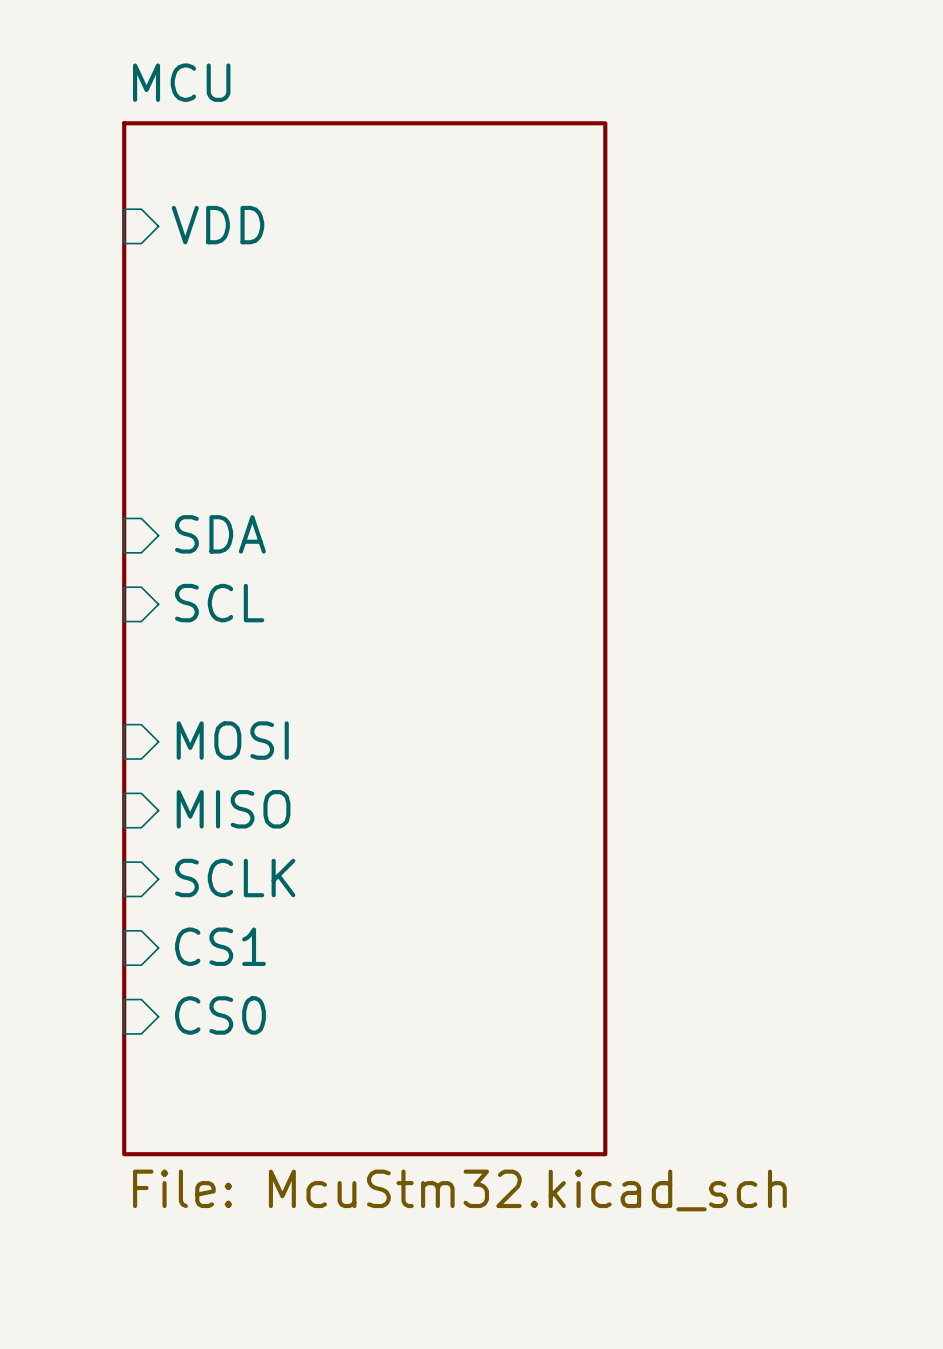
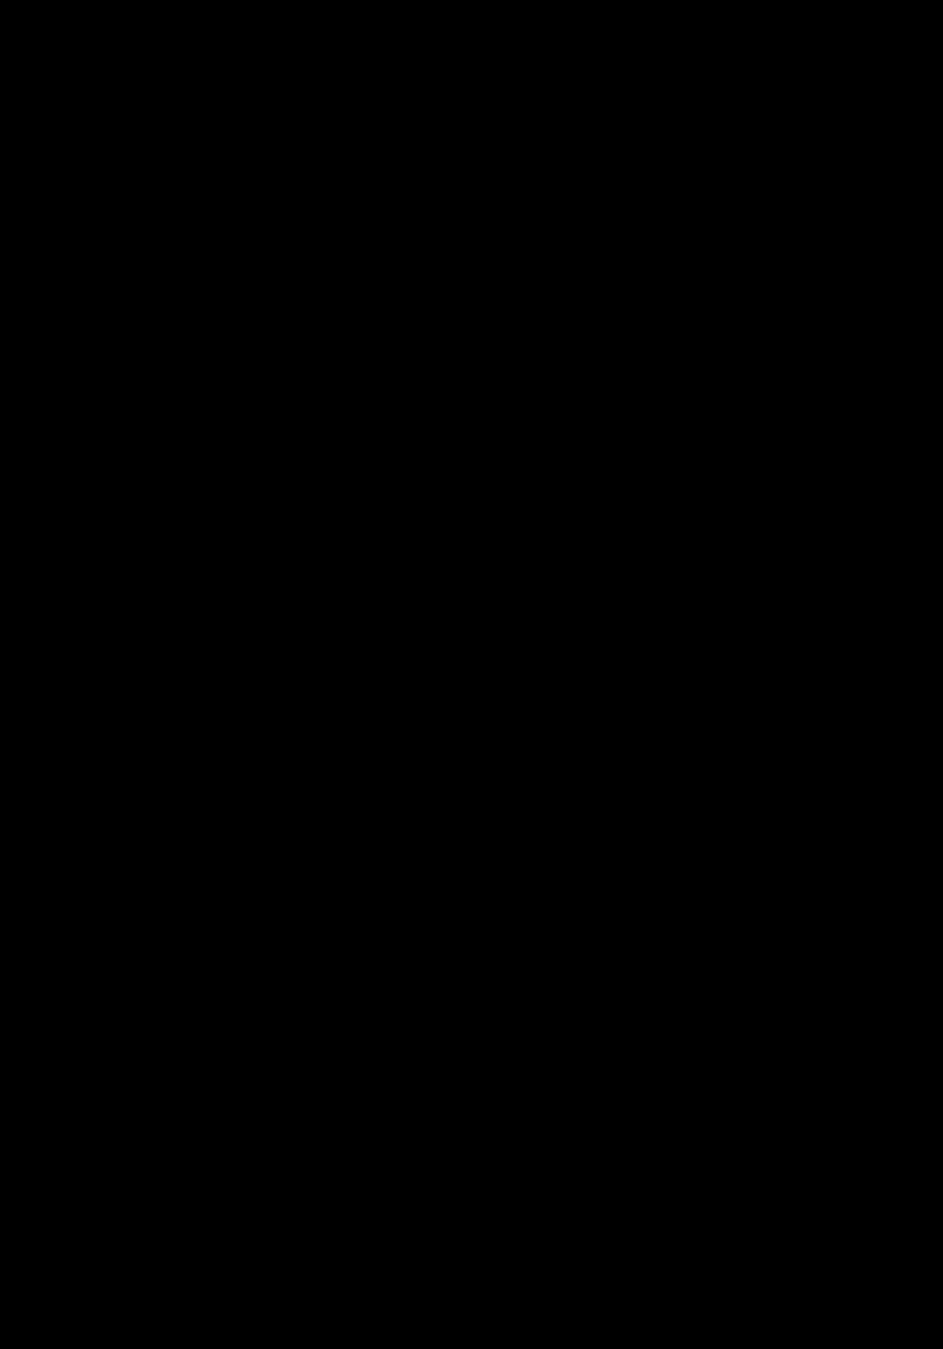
sheet pin: VDD (218, 225) -> none
sheet pin: SDA (220, 534) -> none
sheet pin: SCL (219, 603) -> none
sheet MCU: File: McuStm32.kicad_sch (364, 638) -> none
sheet pin: MOSI (232, 740) -> none
sheet pin: MISO (233, 809) -> none
sheet pin: SCLK (235, 878) -> none
sheet pin: CS1 (220, 946) -> none
sheet pin: CS0 (220, 1015) -> none

